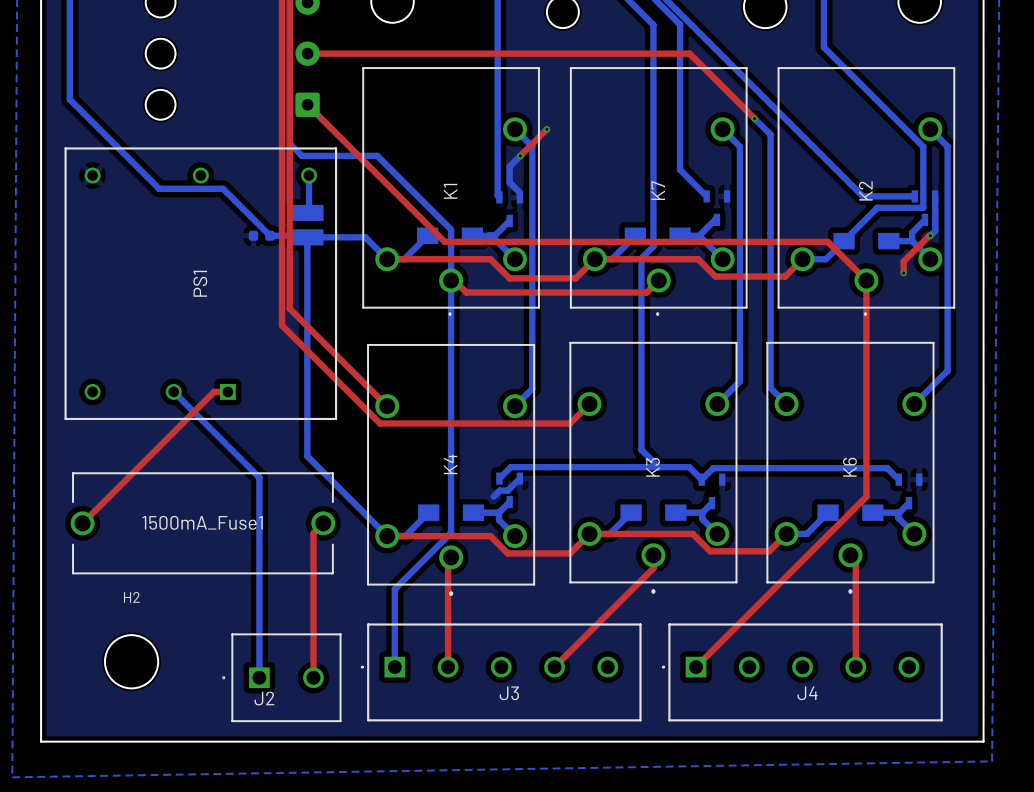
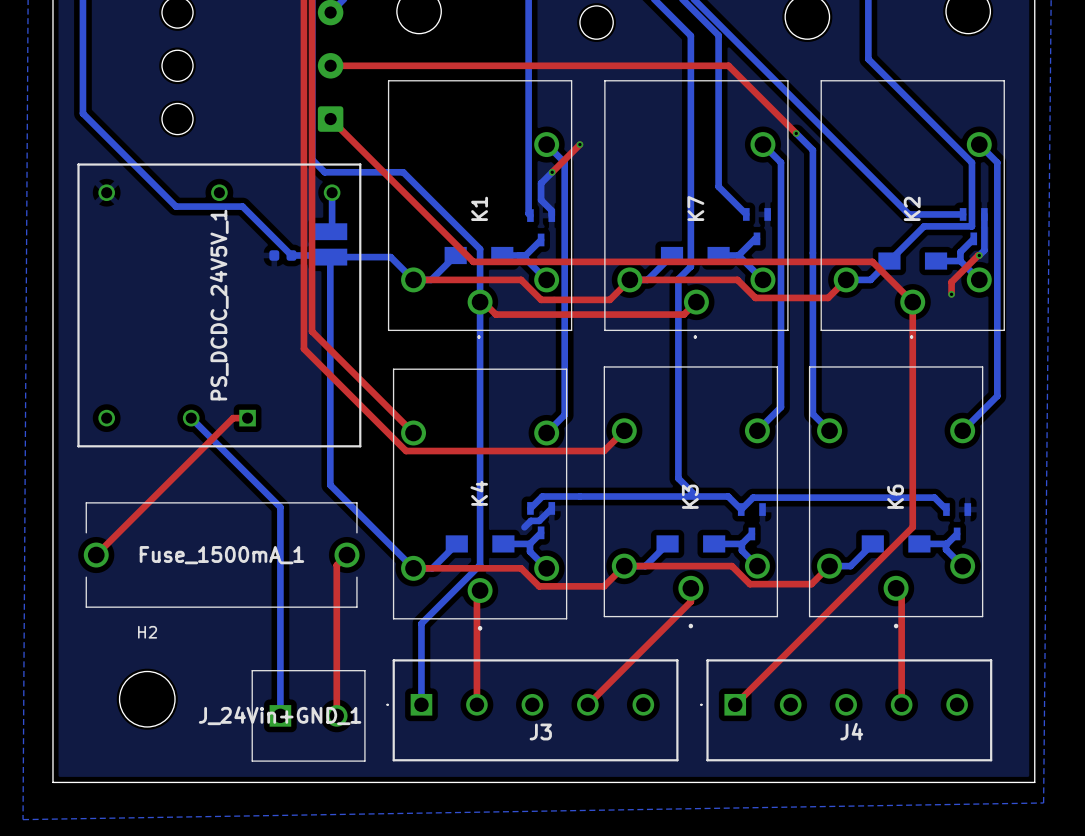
PS1 name: PS1 (200, 283) -> PS_DCDC_24V5V_1 (219, 305)
1500mA_Fuse1 name: 1500mA_Fuse1 (202, 522) -> Fuse_1500mA_1 (221, 555)
J2 name: J2 (264, 698) -> J_24Vin+GND_1 (280, 715)

